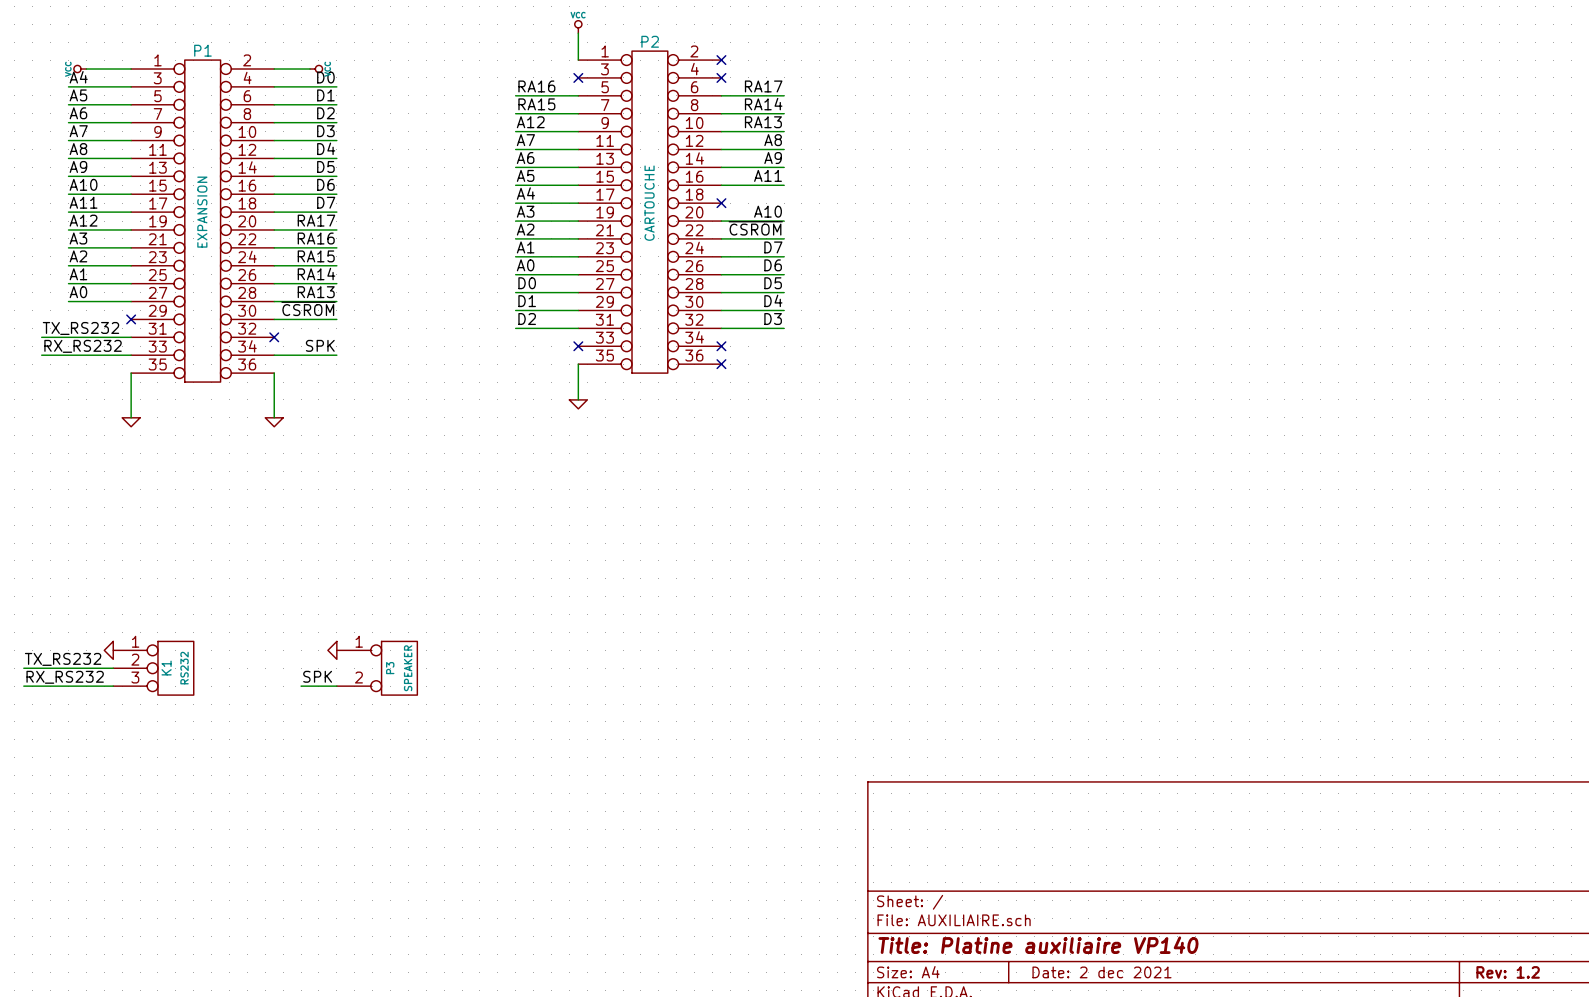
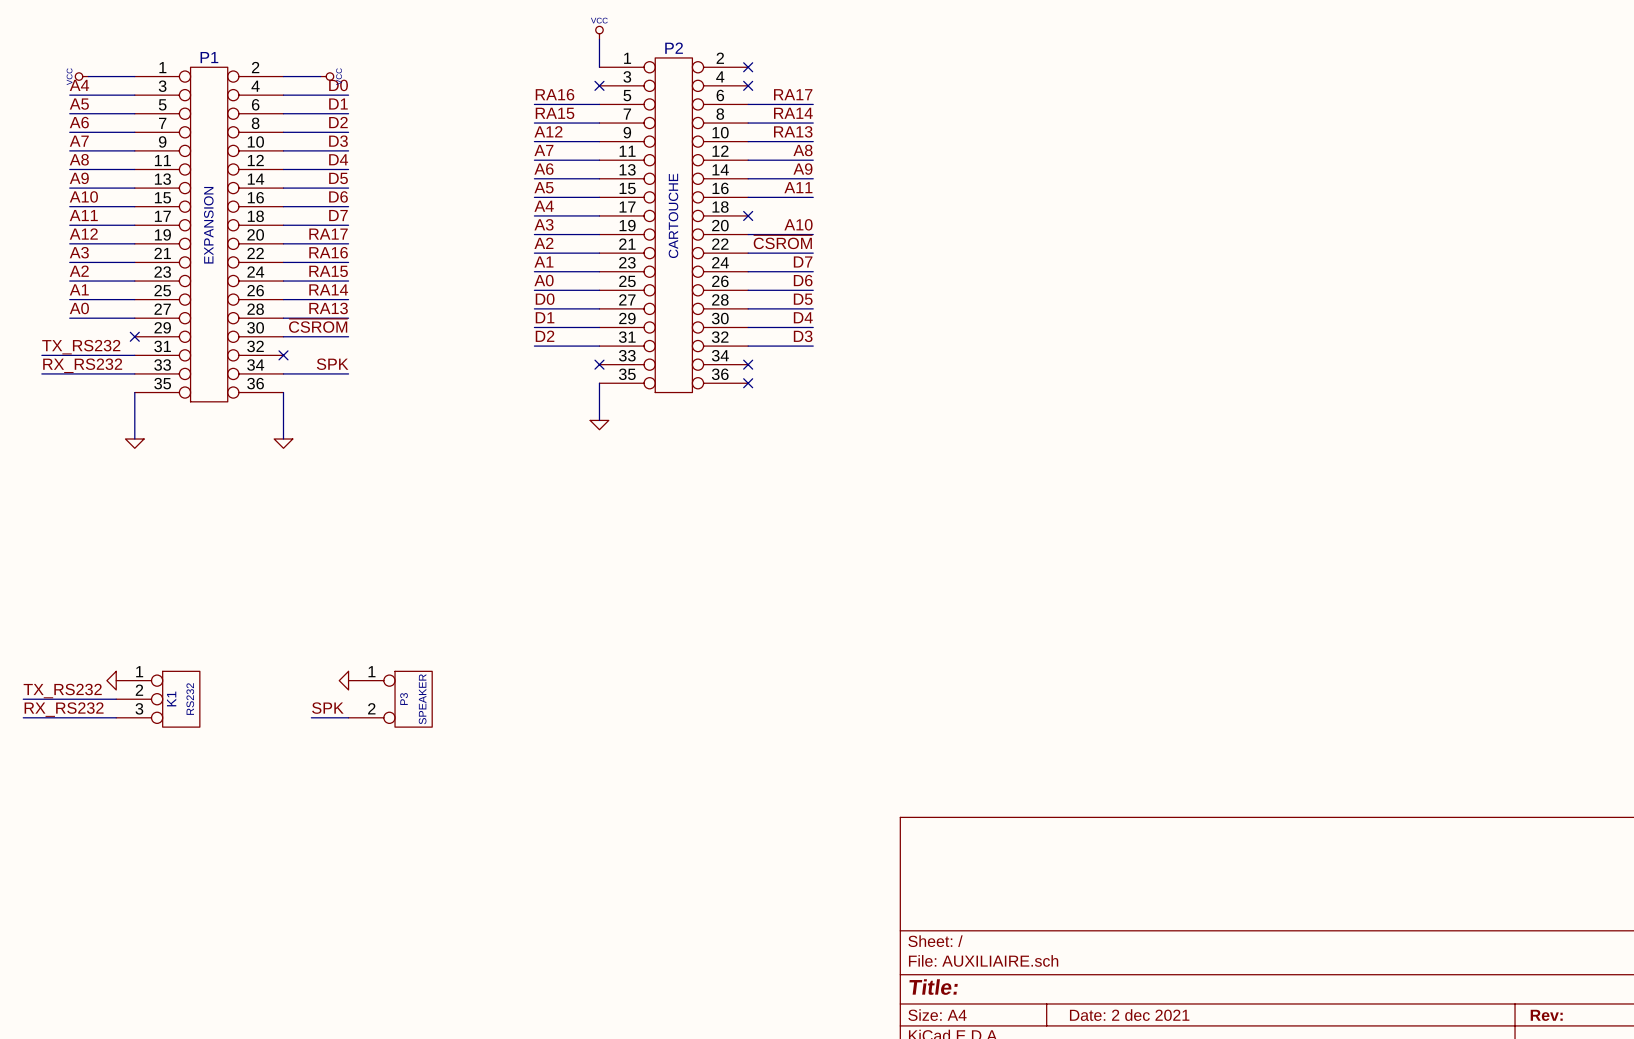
title block: Title: Platine auxiliaire VP140 (1038, 945) -> Title: (933, 987)
title block: Rev: 1.2 (1508, 972) -> Rev: (1546, 1015)

